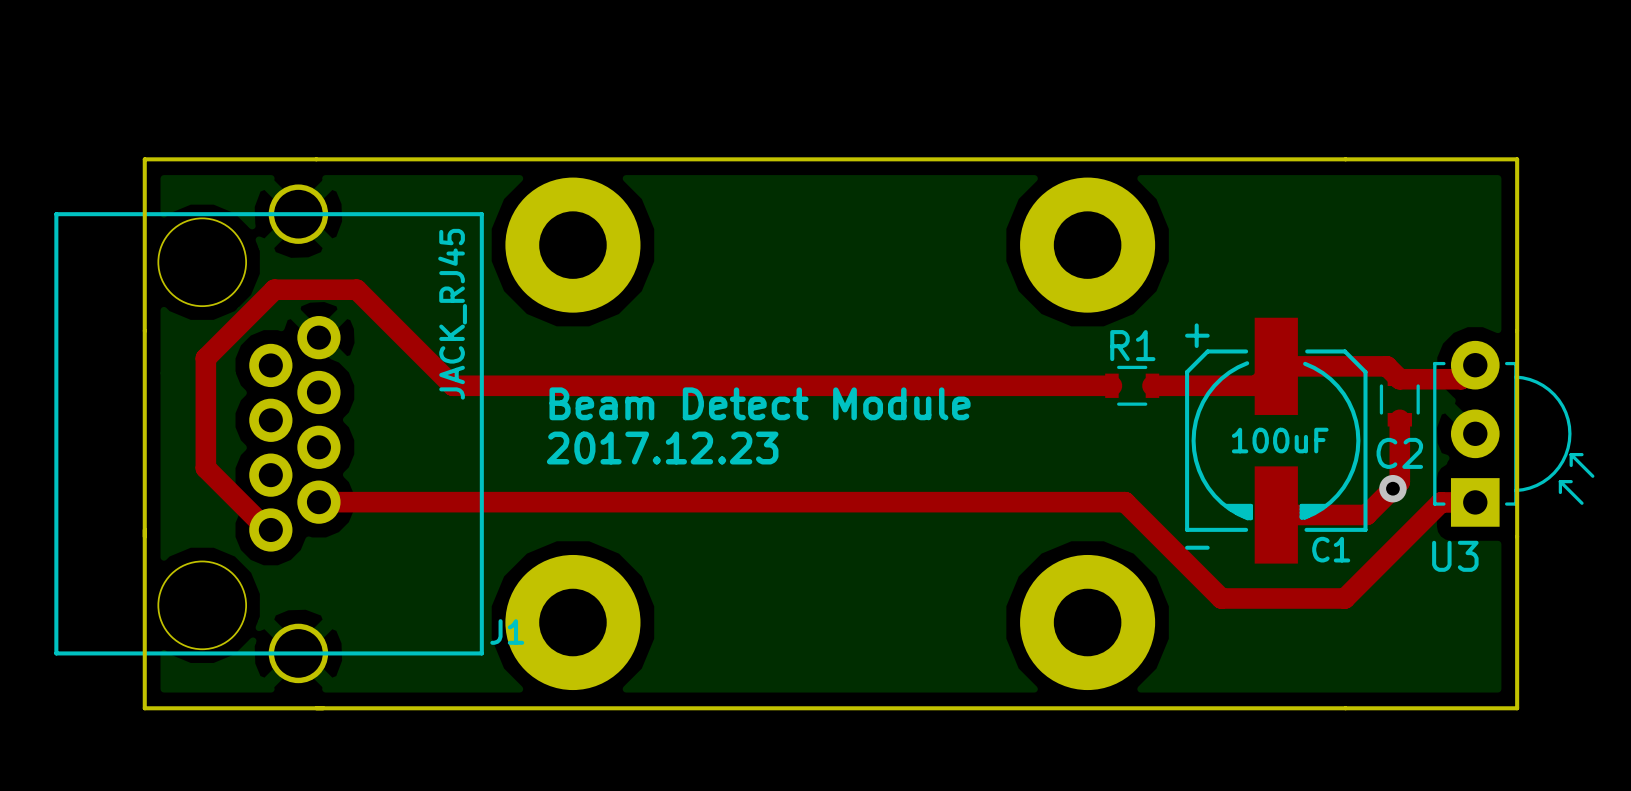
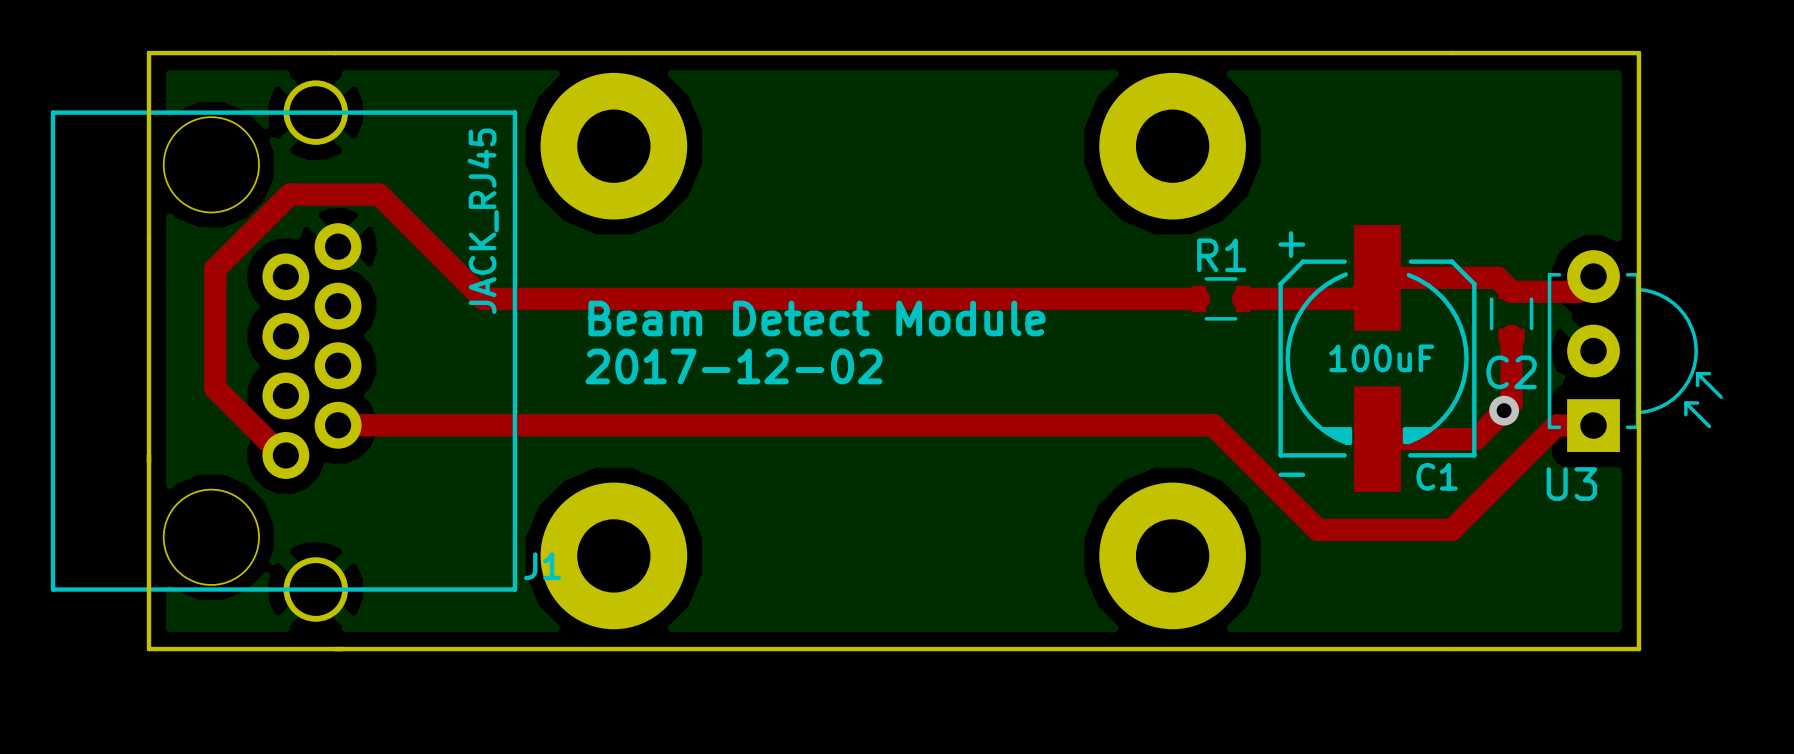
text: 2017.12.23 (662, 448) -> 2017-12-02 (733, 366)

